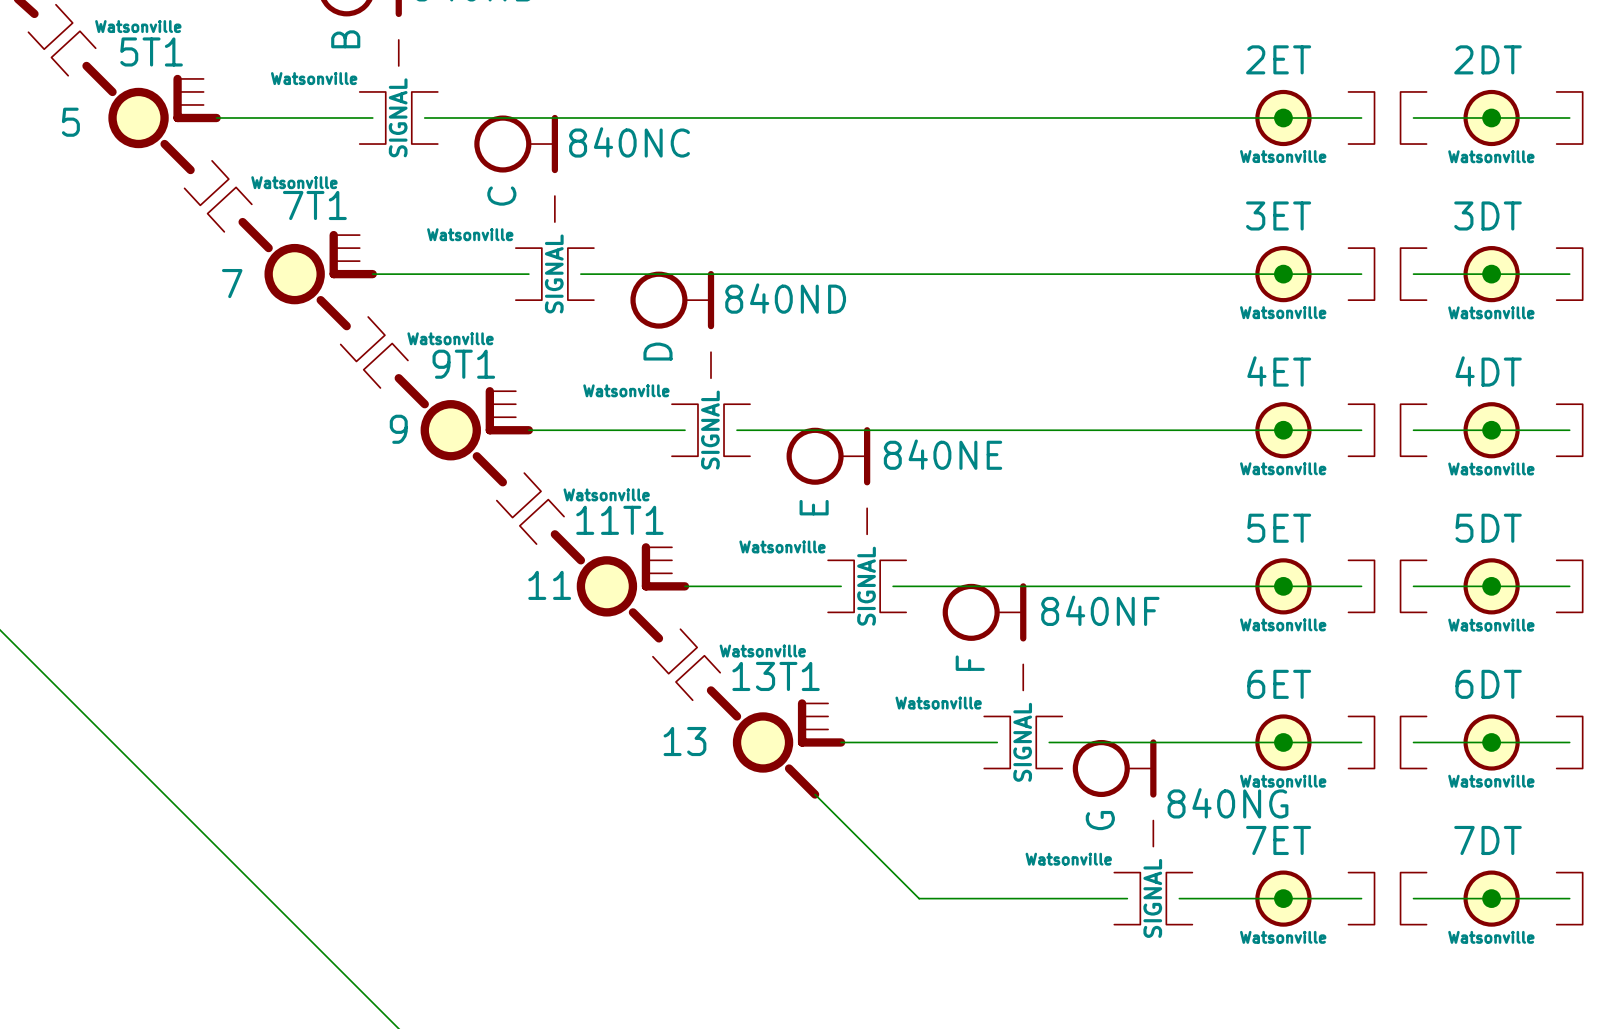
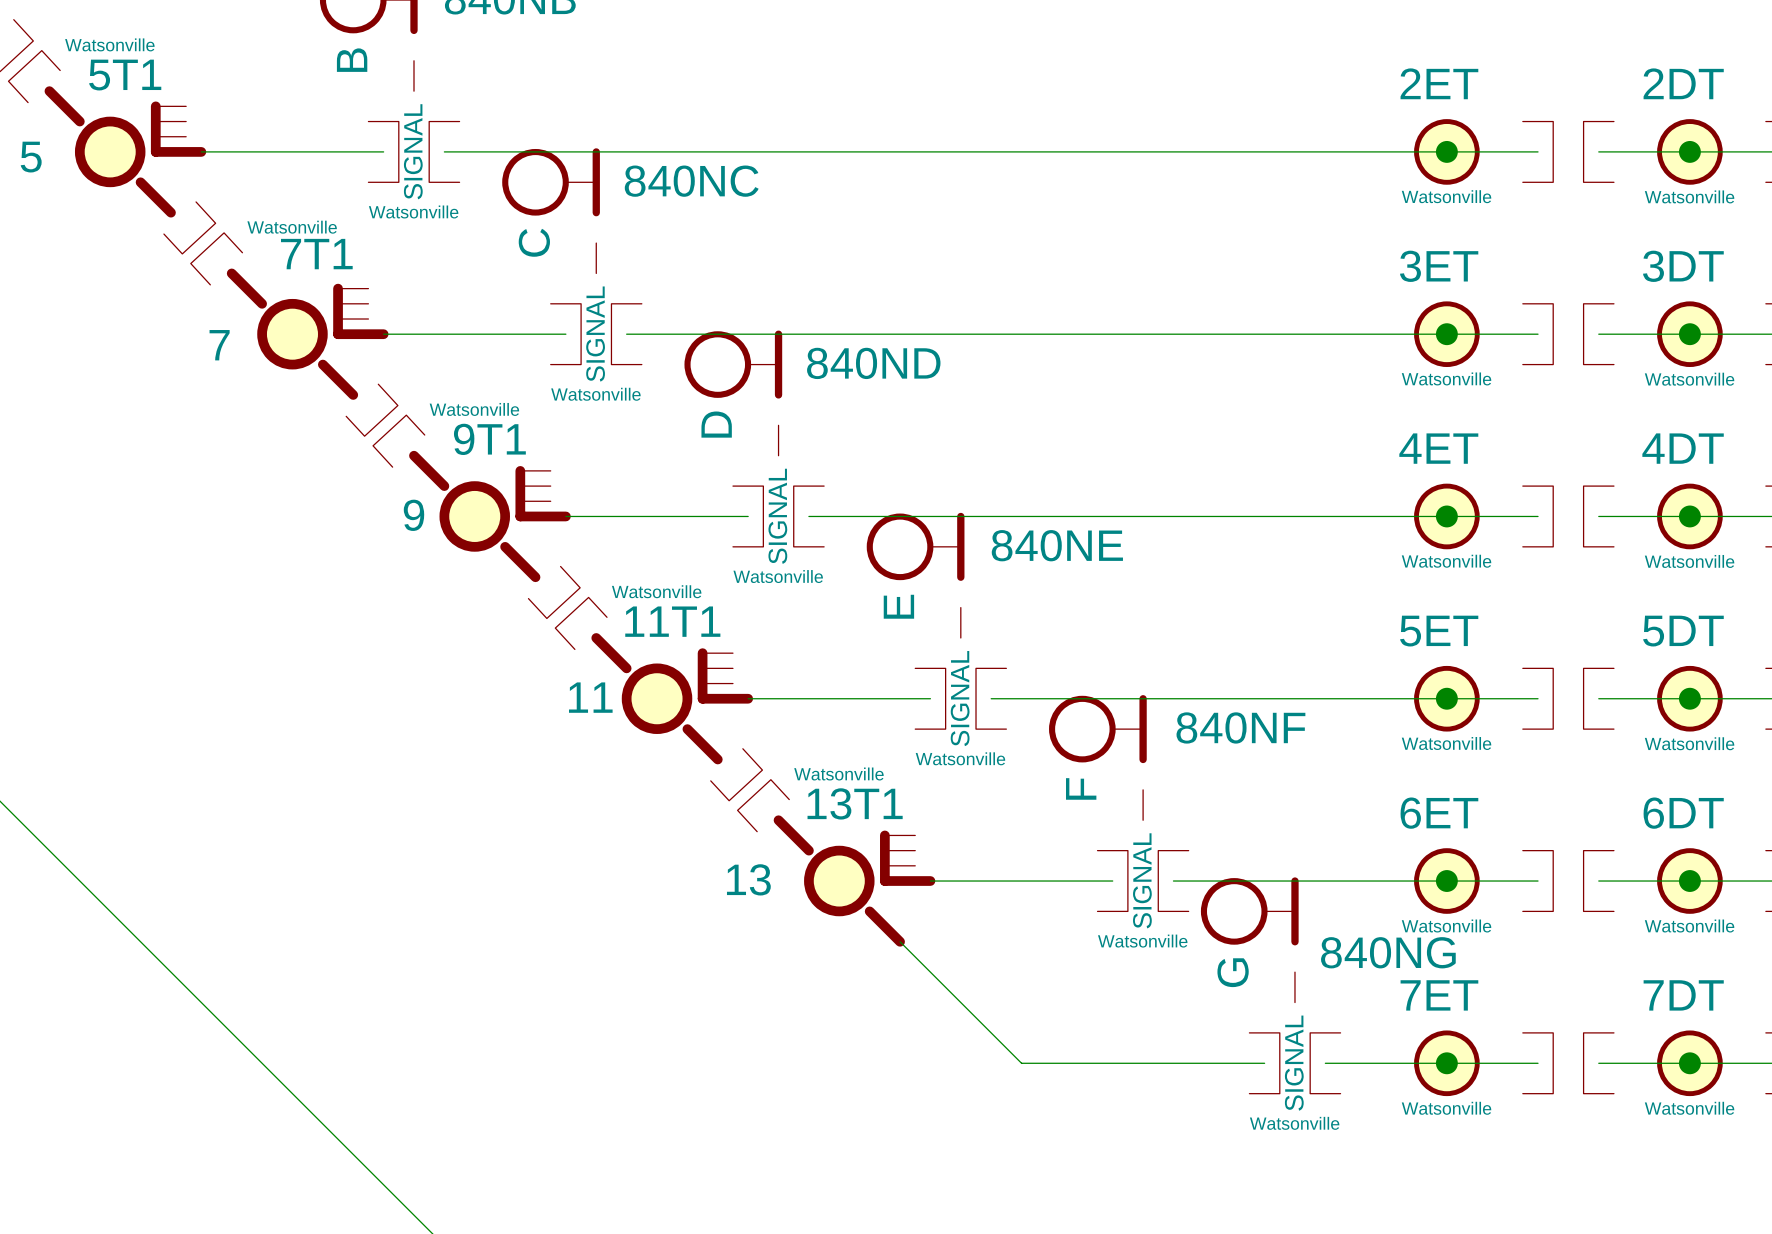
part text position: Watsonville (314, 78) -> Watsonville (413, 211)
part text position: Watsonville (470, 234) -> Watsonville (595, 394)
part text position: Watsonville (626, 390) -> Watsonville (778, 576)
part text position: Watsonville (782, 546) -> Watsonville (960, 758)
part text position: Watsonville (938, 703) -> Watsonville (1142, 941)
part text position: Watsonville (1068, 859) -> Watsonville (1294, 1123)

